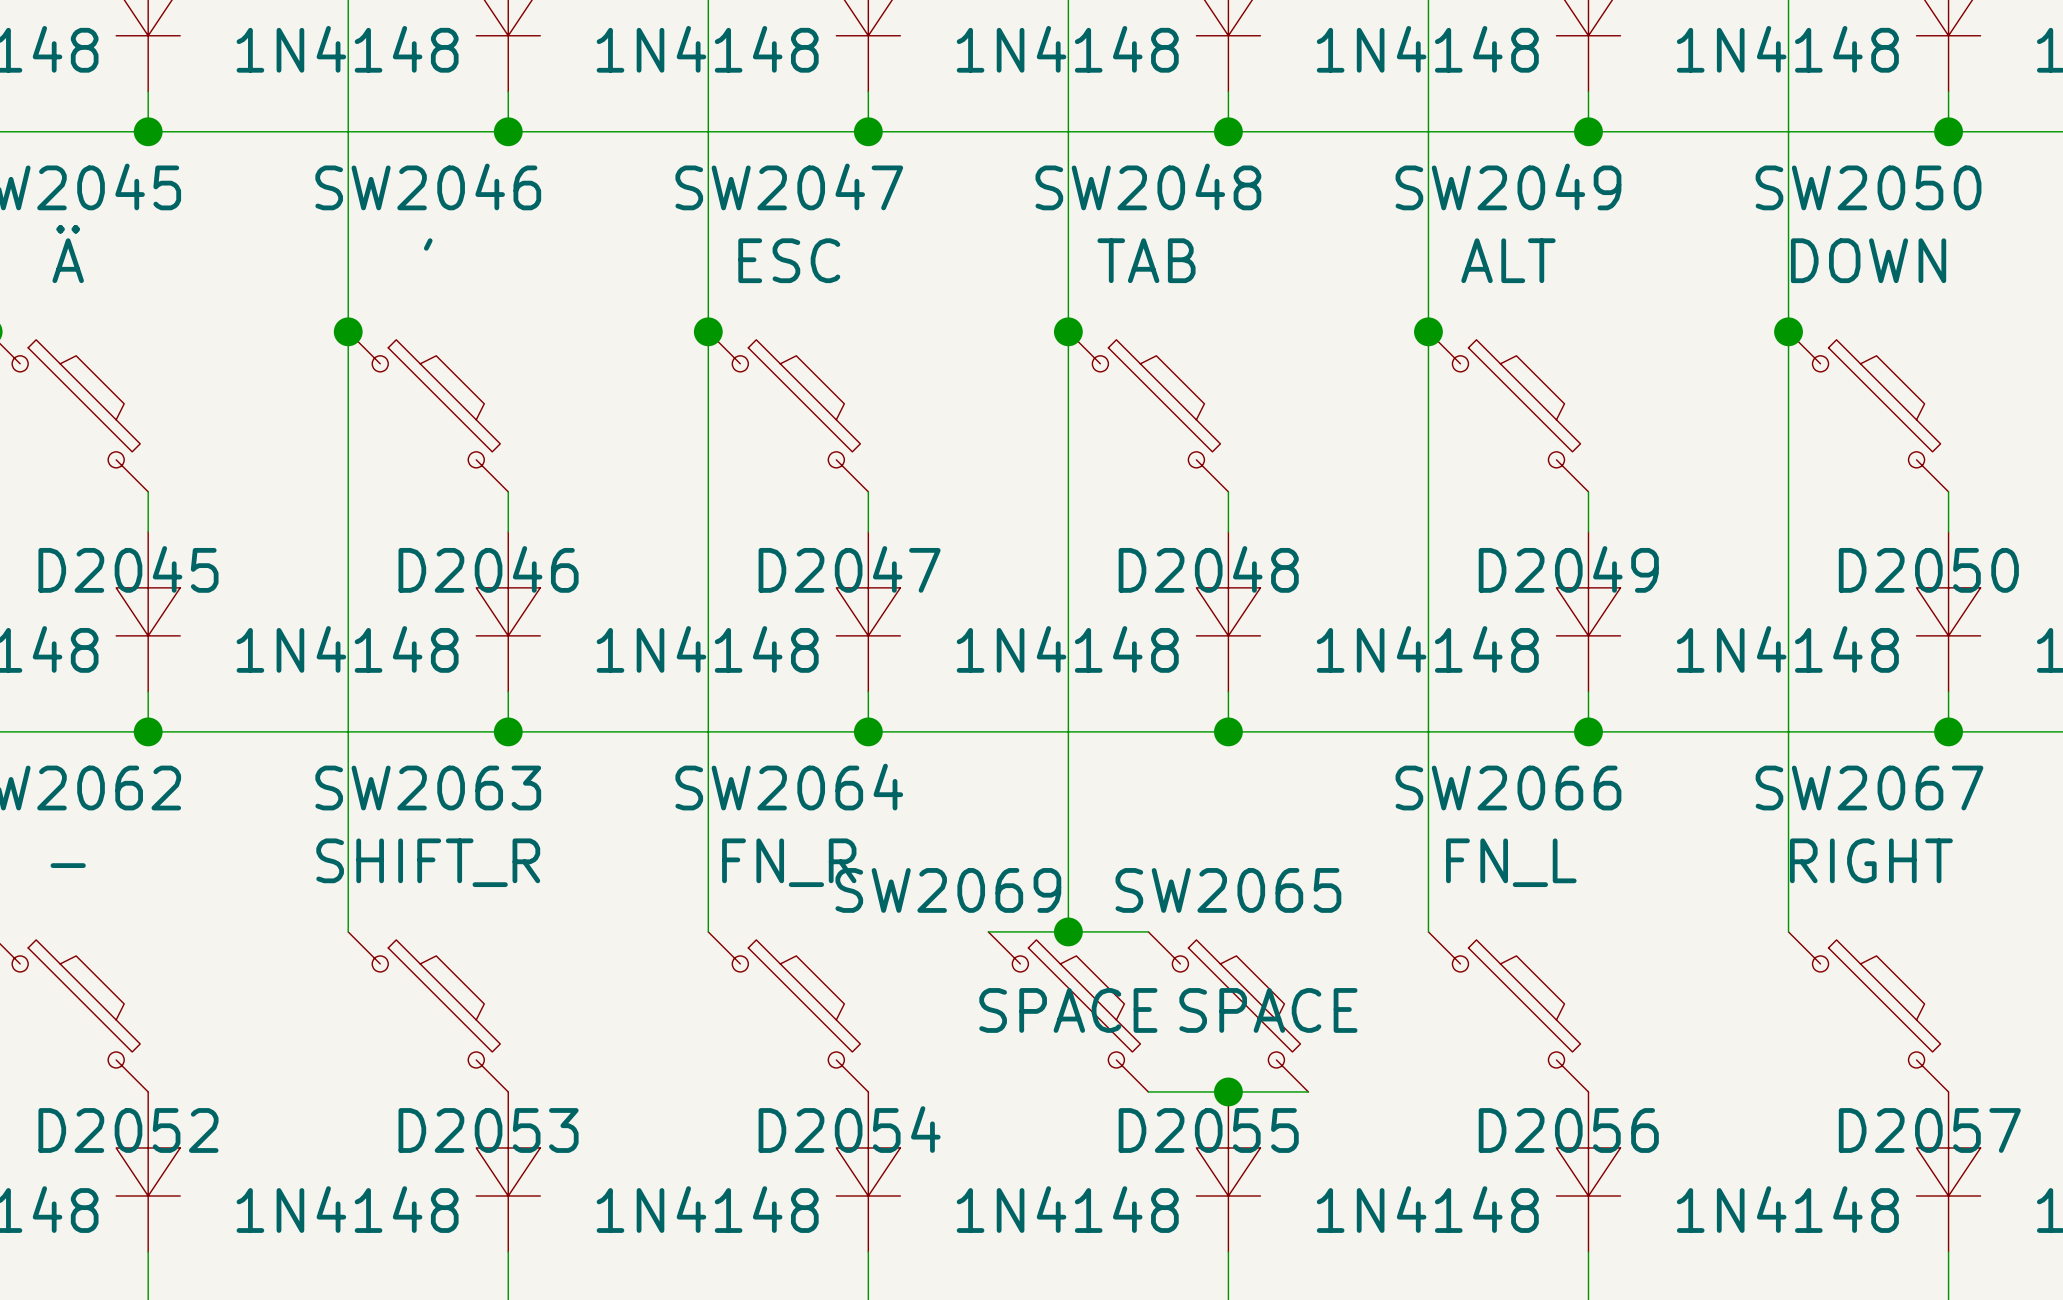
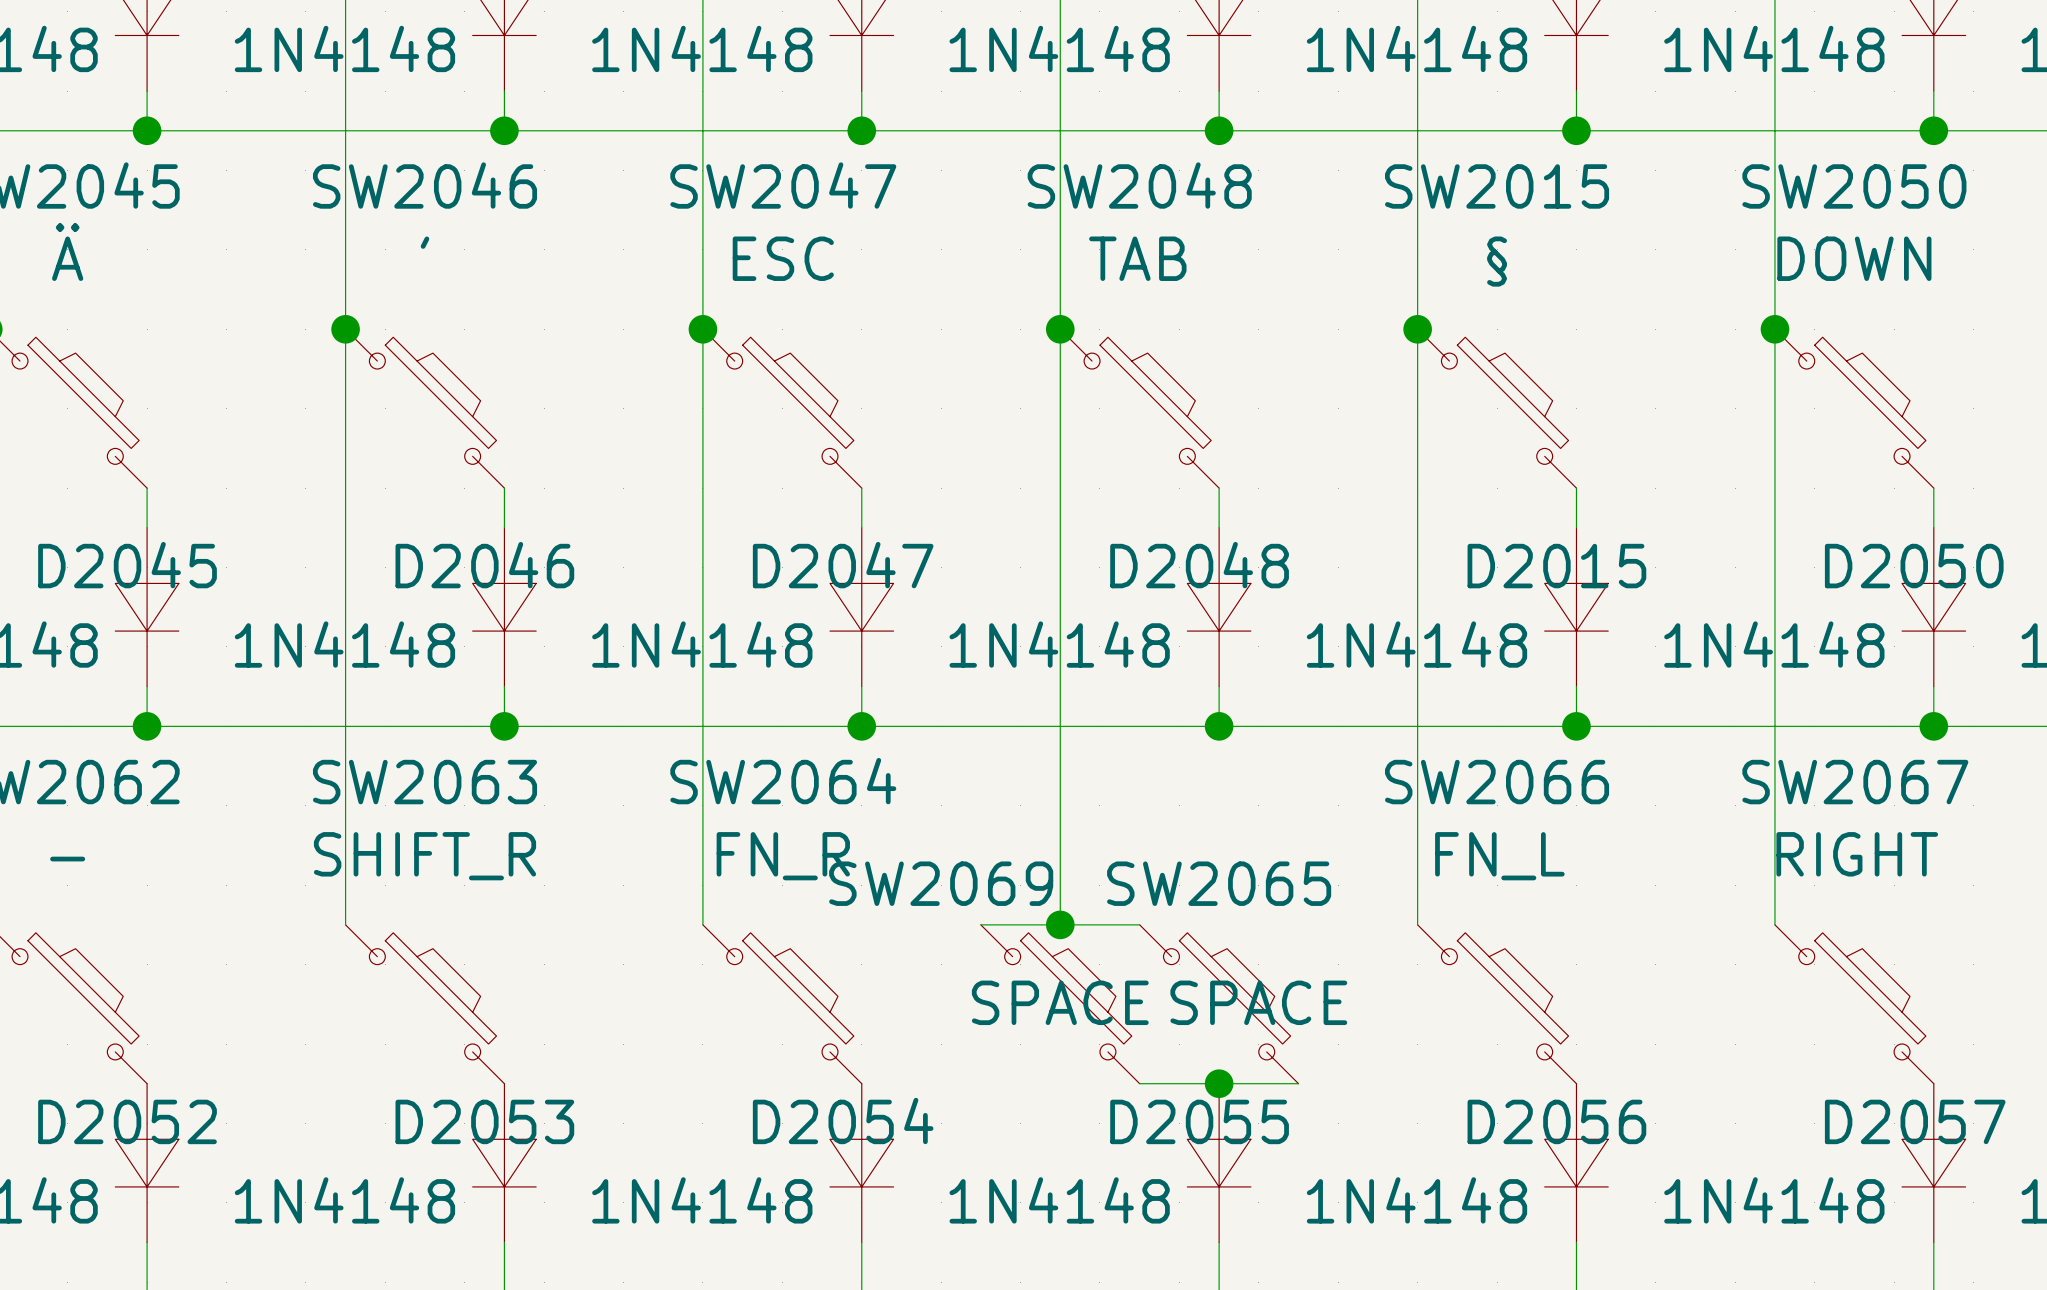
SW2049 name: SW2049 (1508, 186) -> SW2015 (1497, 186)
SW2049 value: ALT (1508, 260) -> § (1497, 261)
D2049 name: D2049 (1568, 569) -> D2015 (1556, 566)

